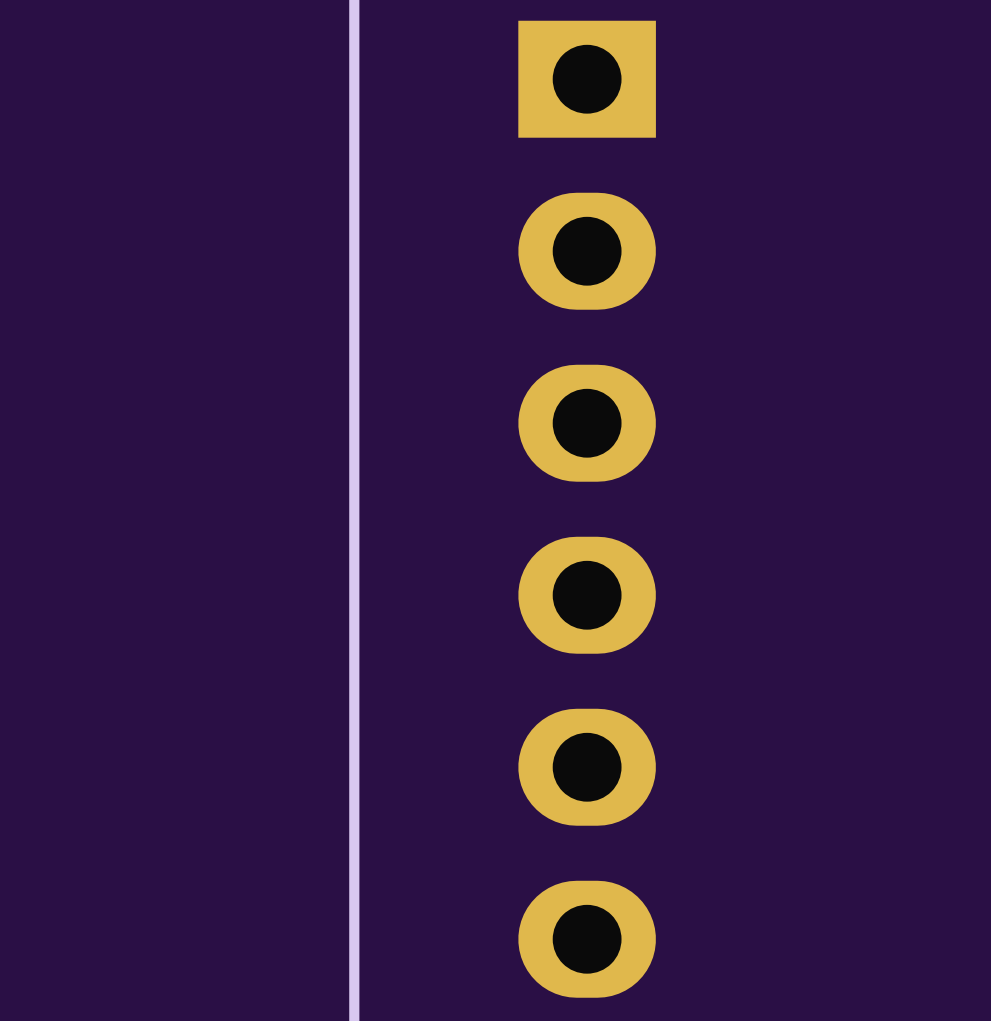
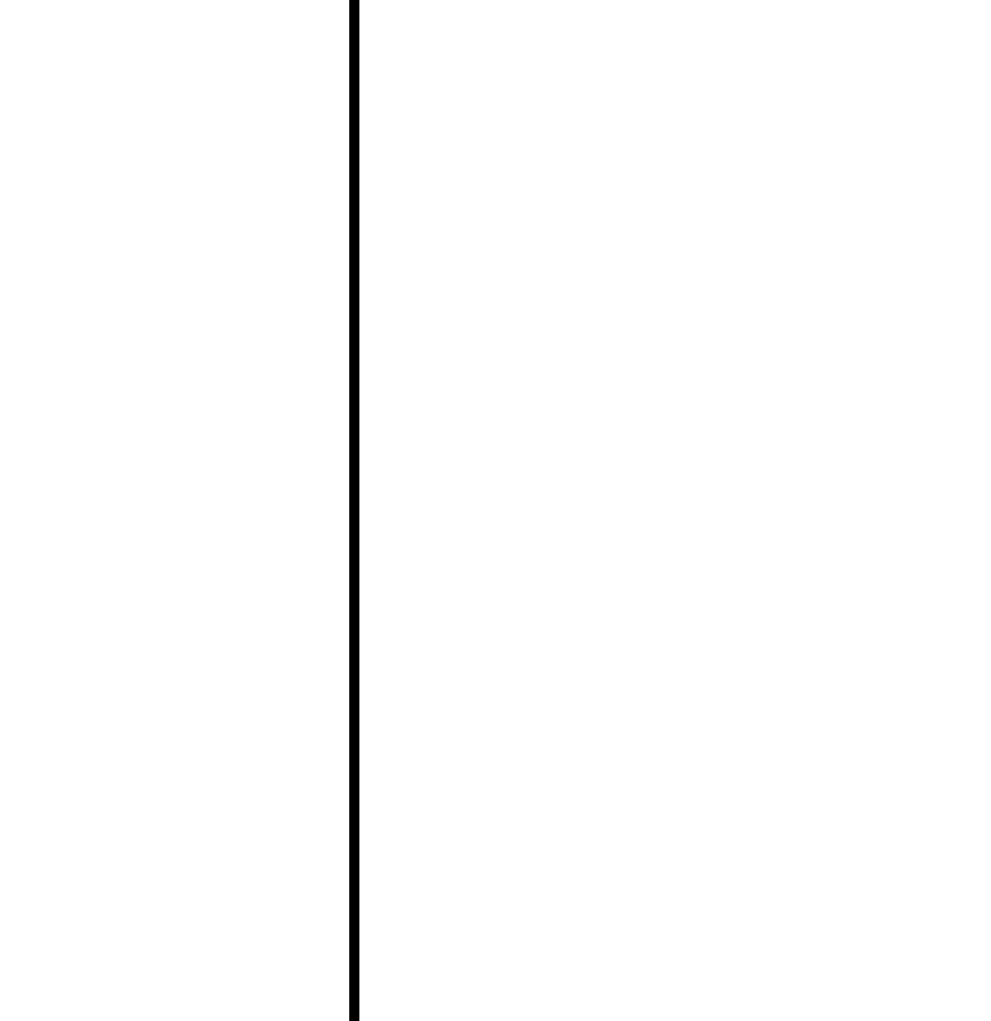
part: (587, 509) -> none

